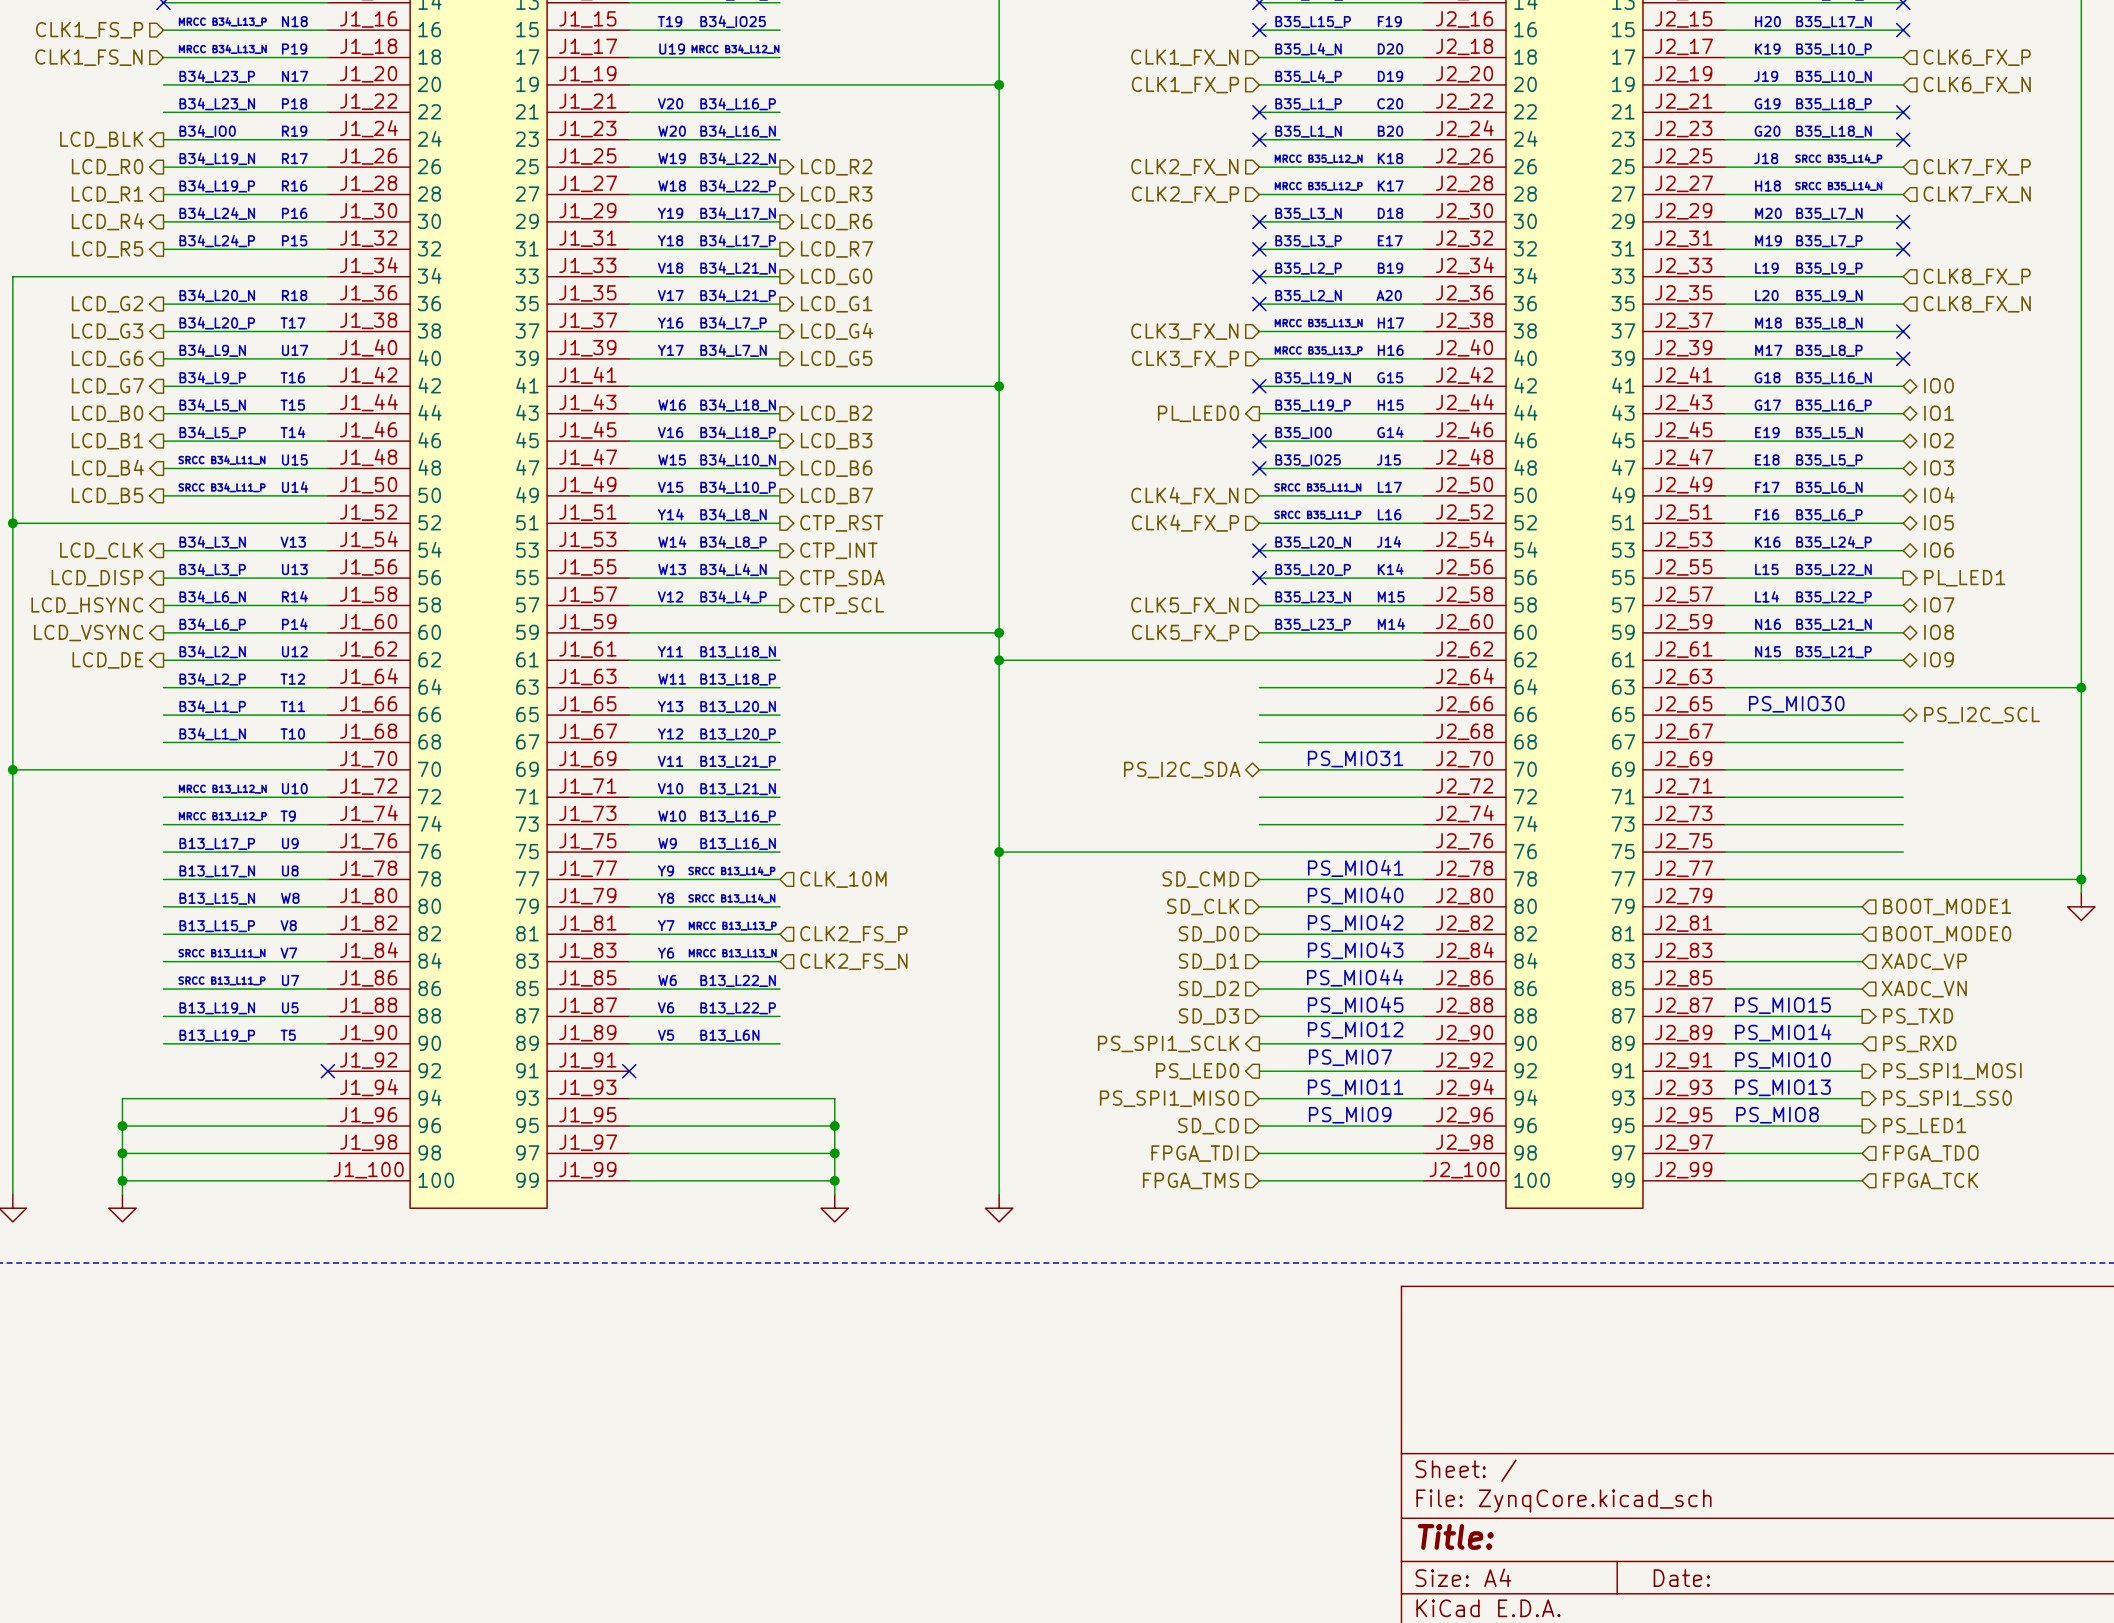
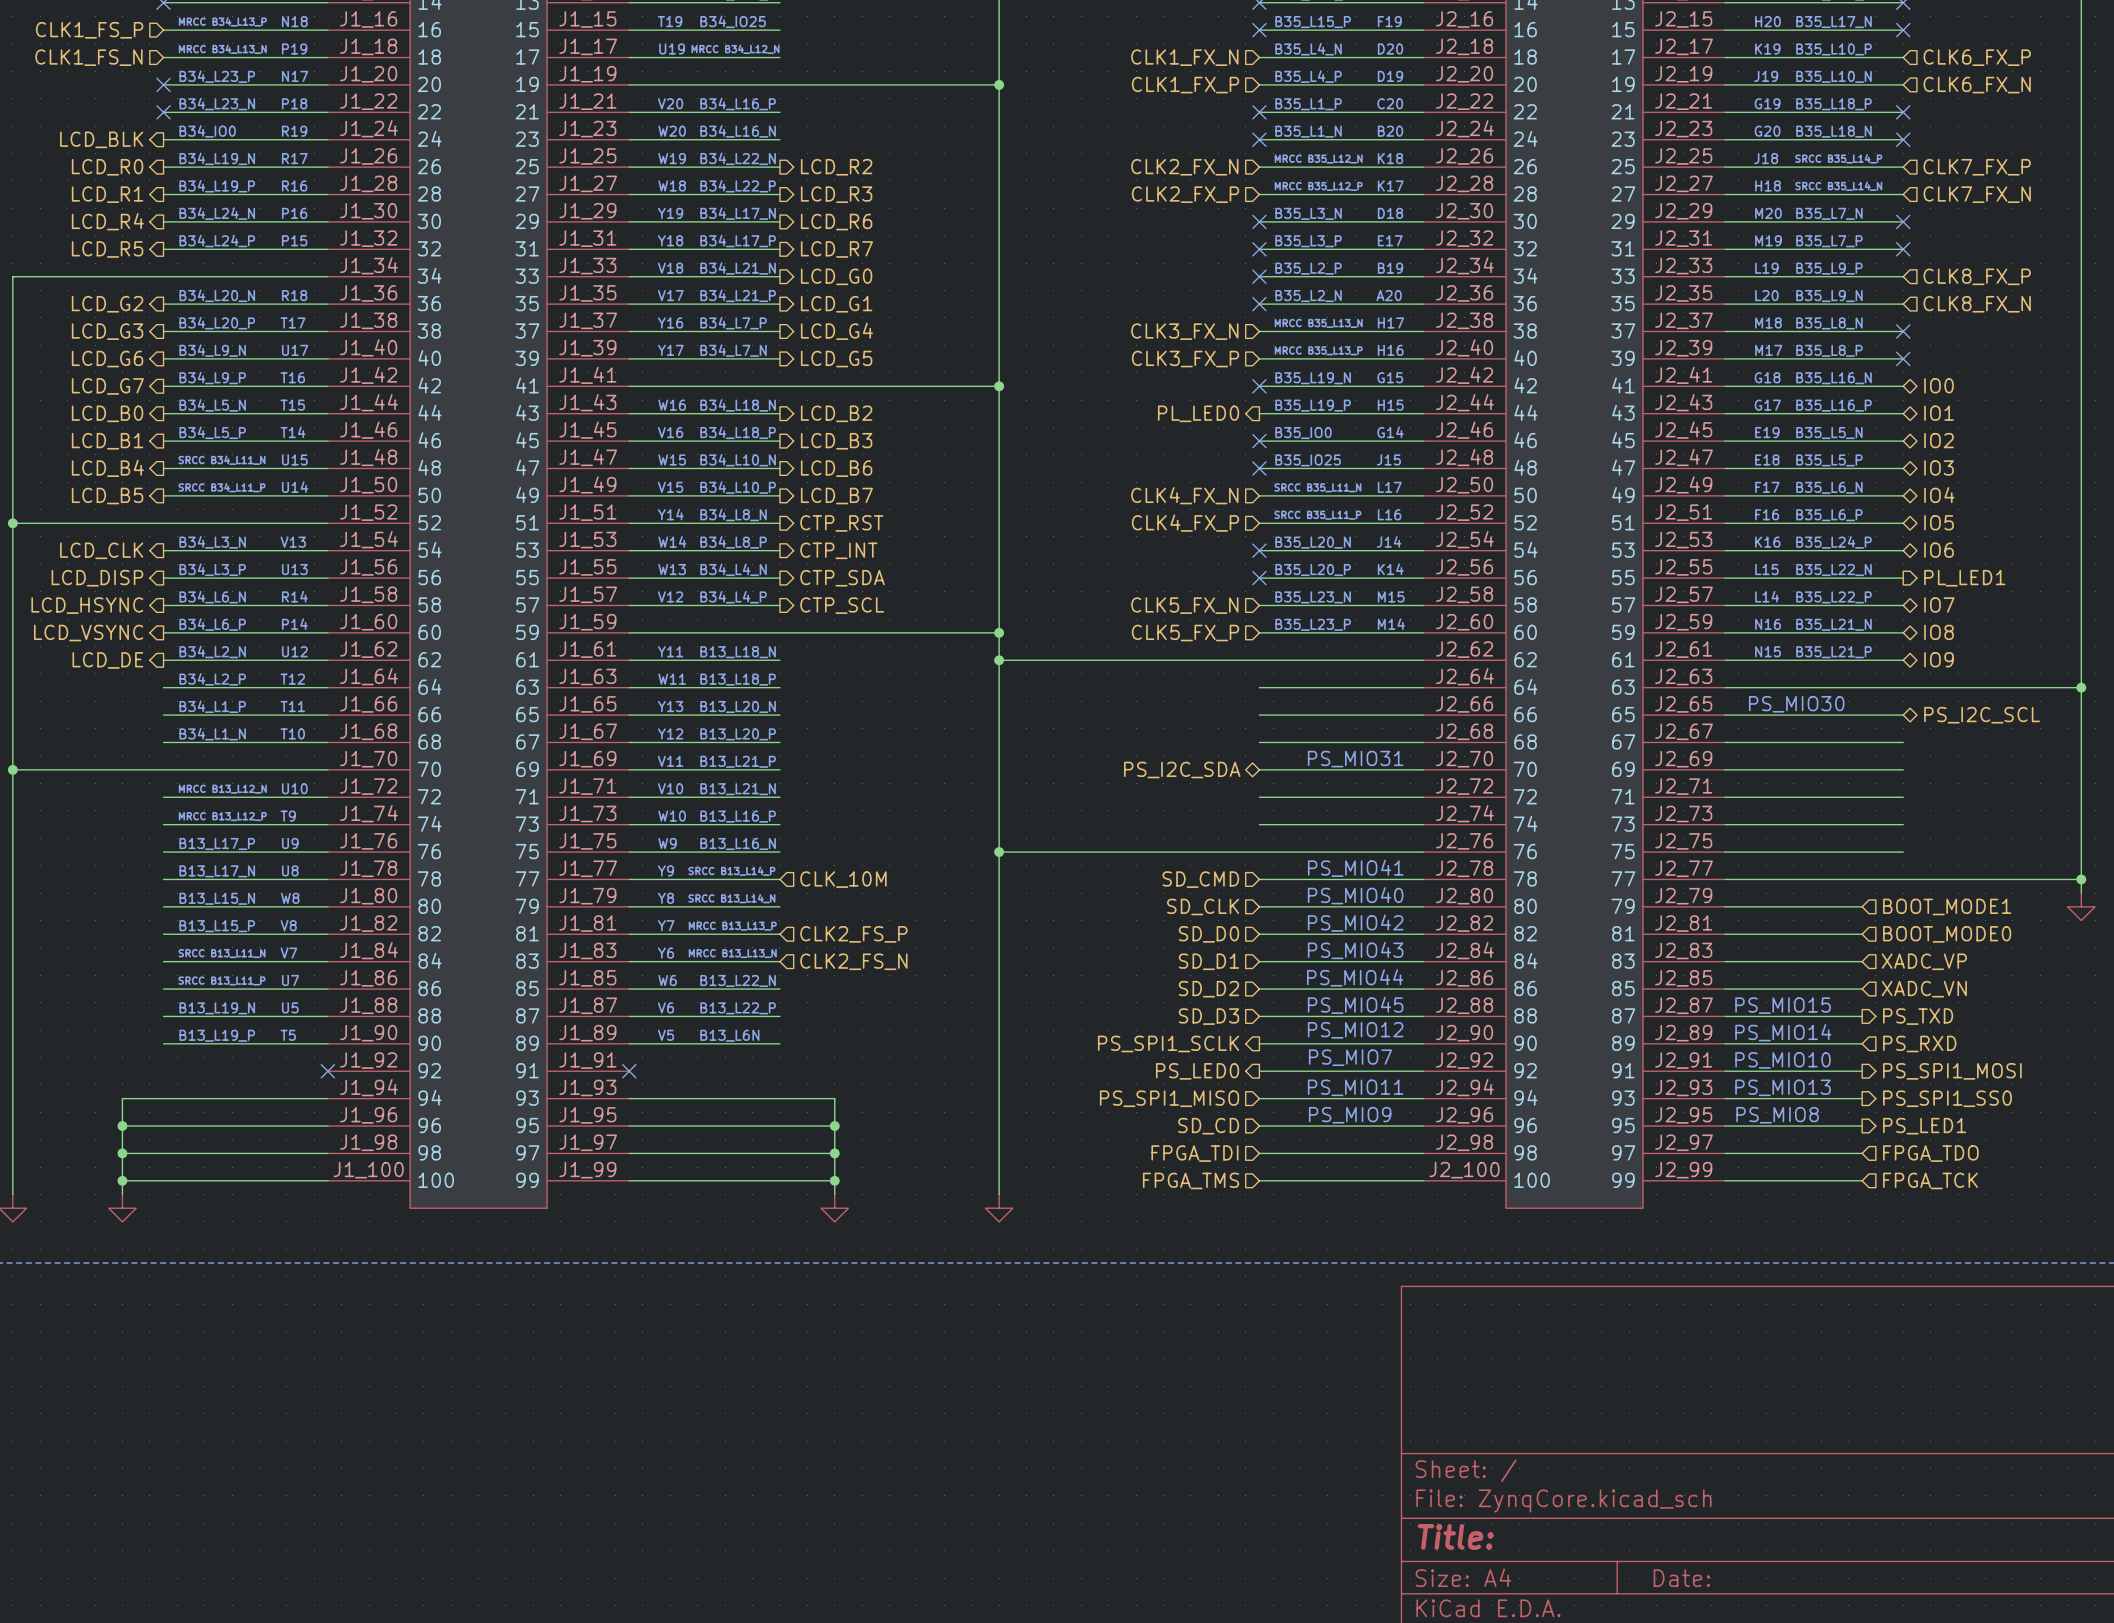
no-connect mark: none -> (163, 84)
no-connect mark: none -> (163, 112)

